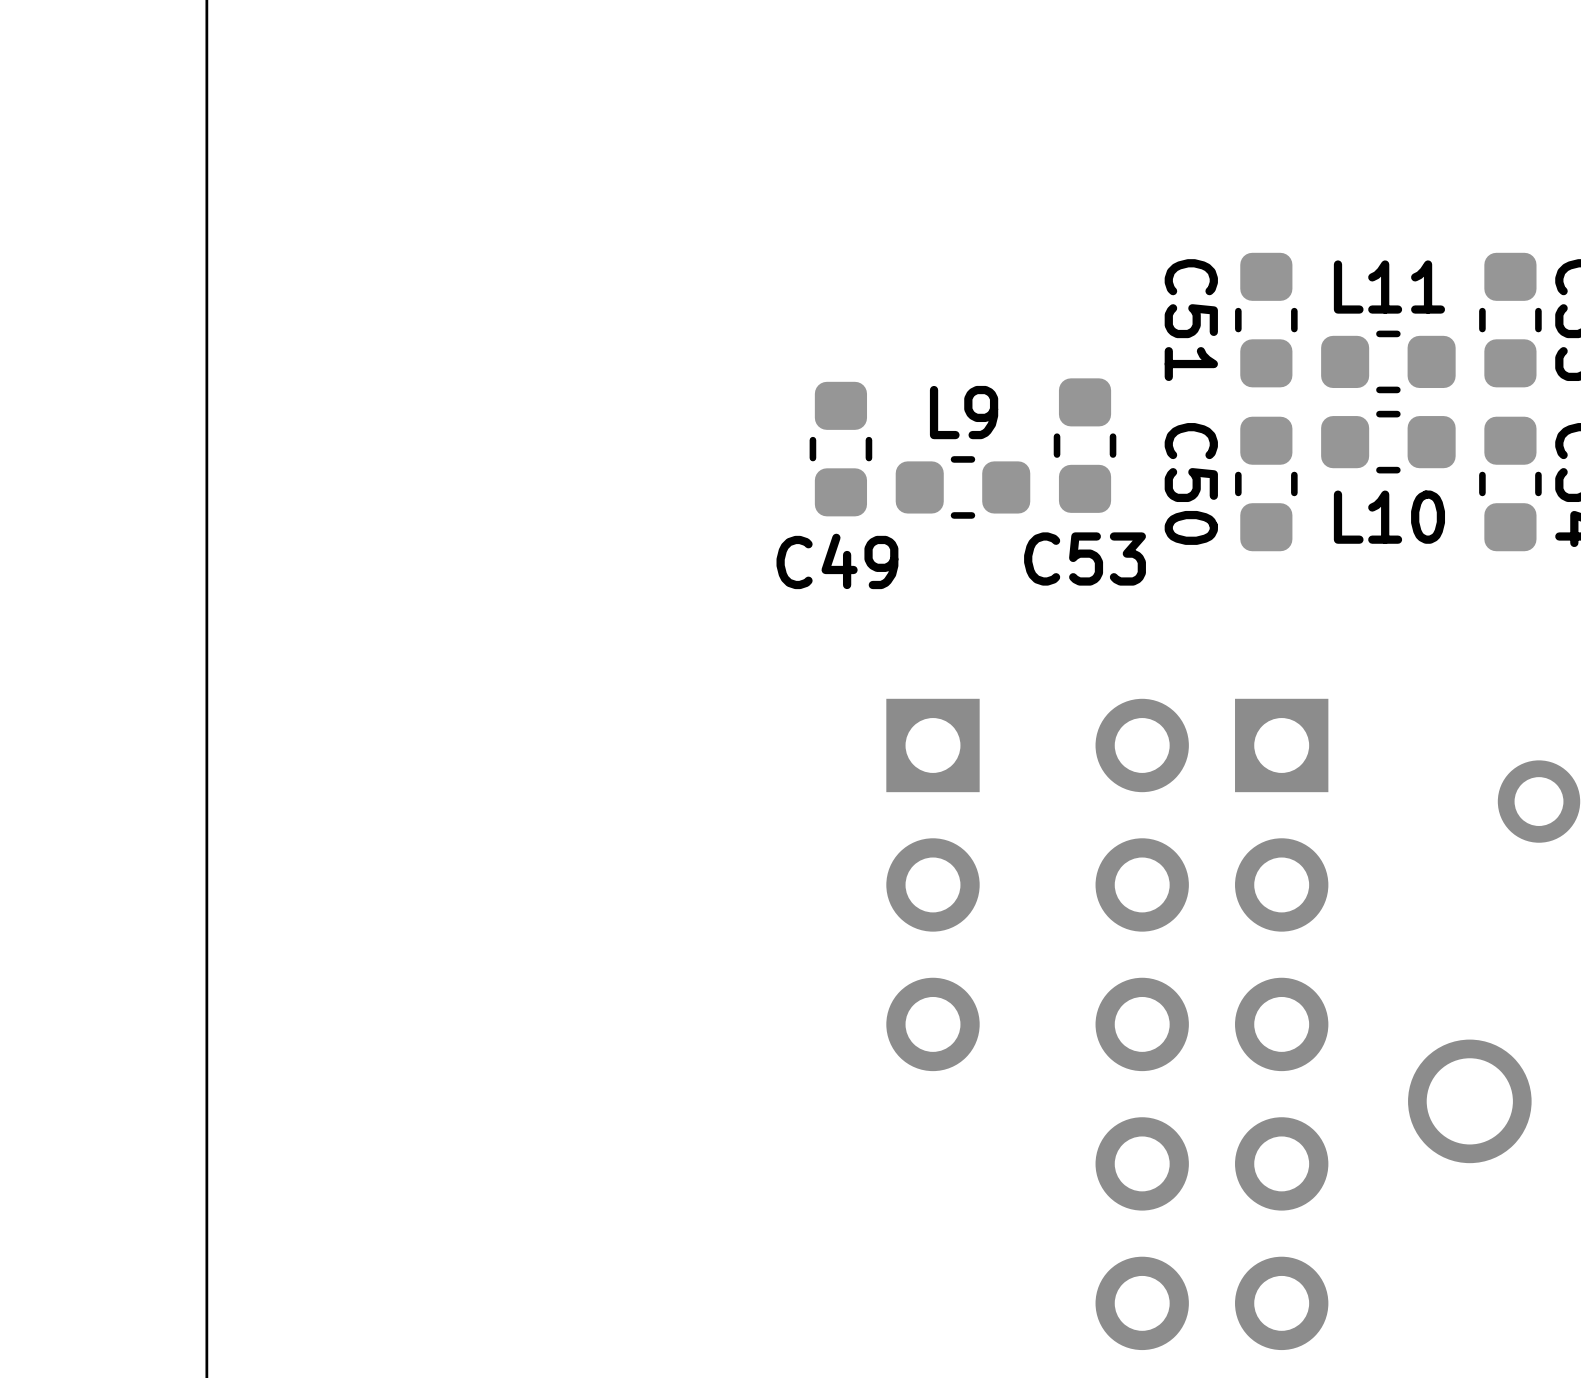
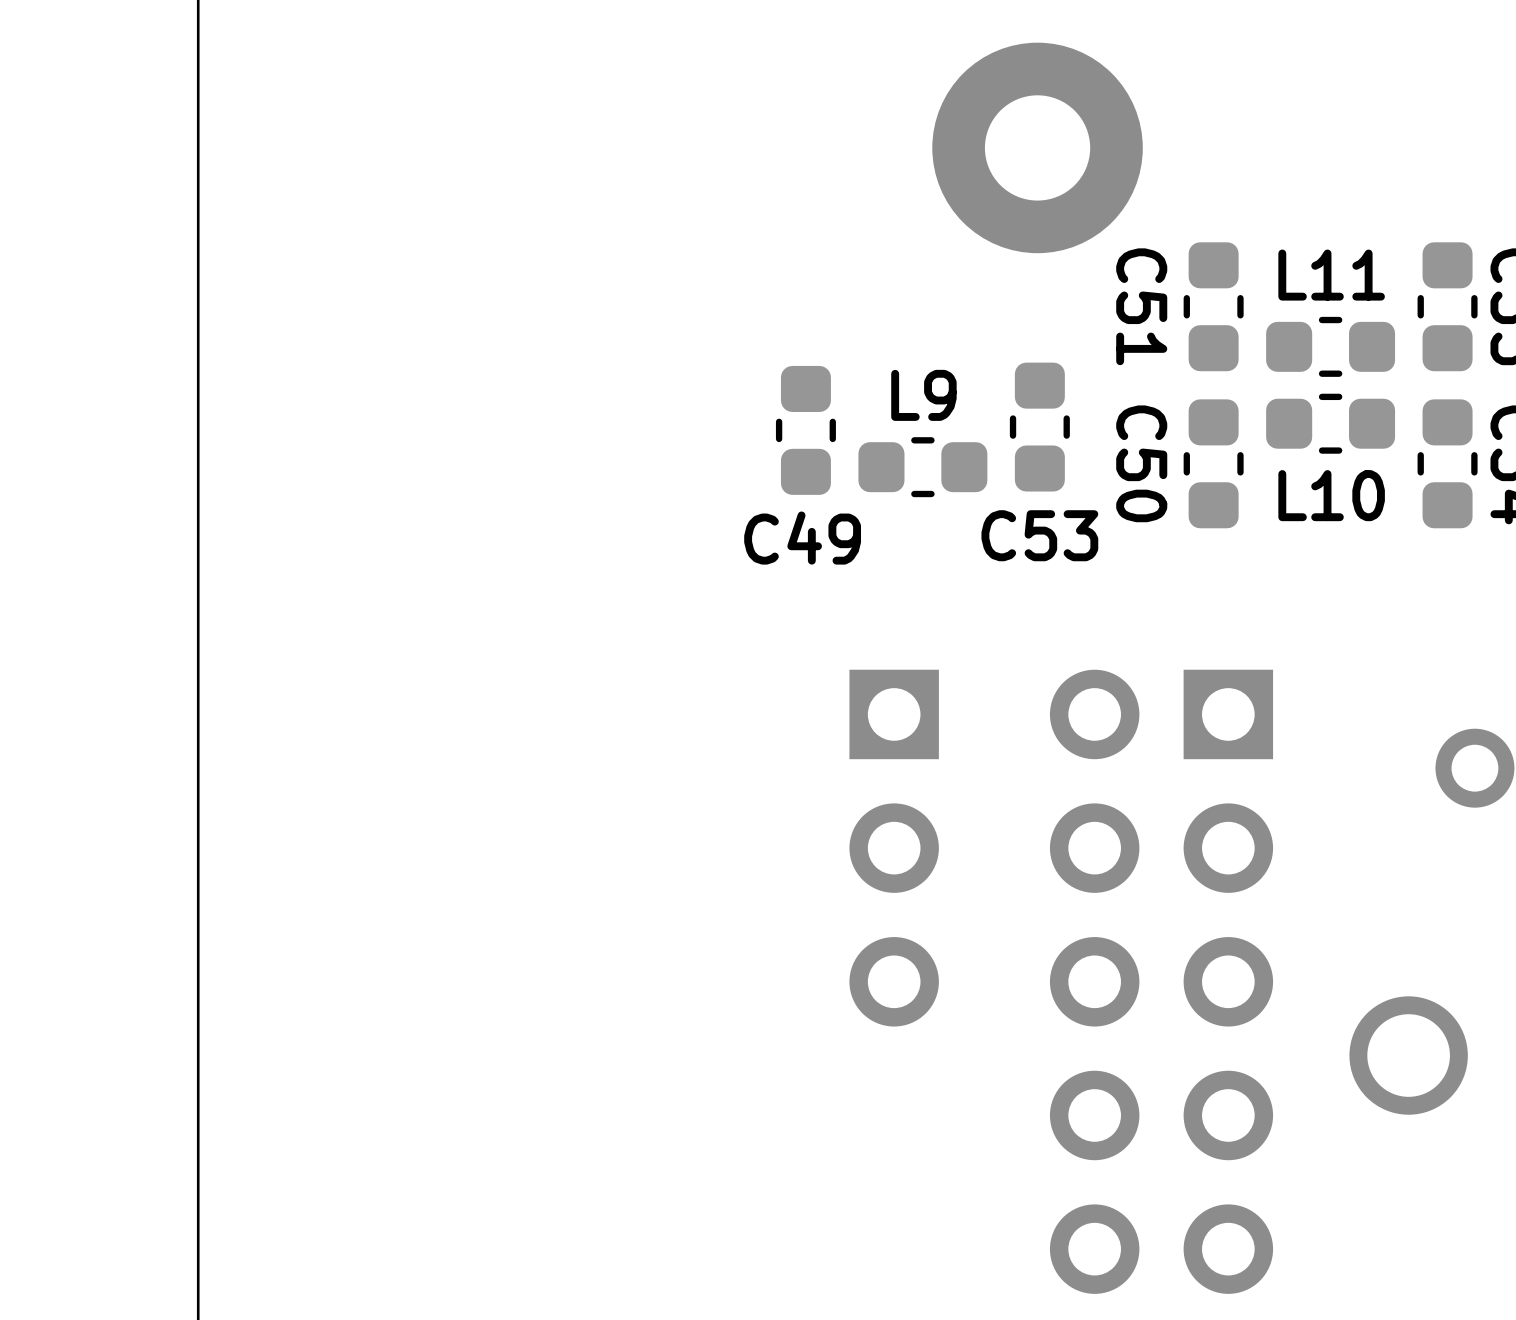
part: none -> (1037, 147)

